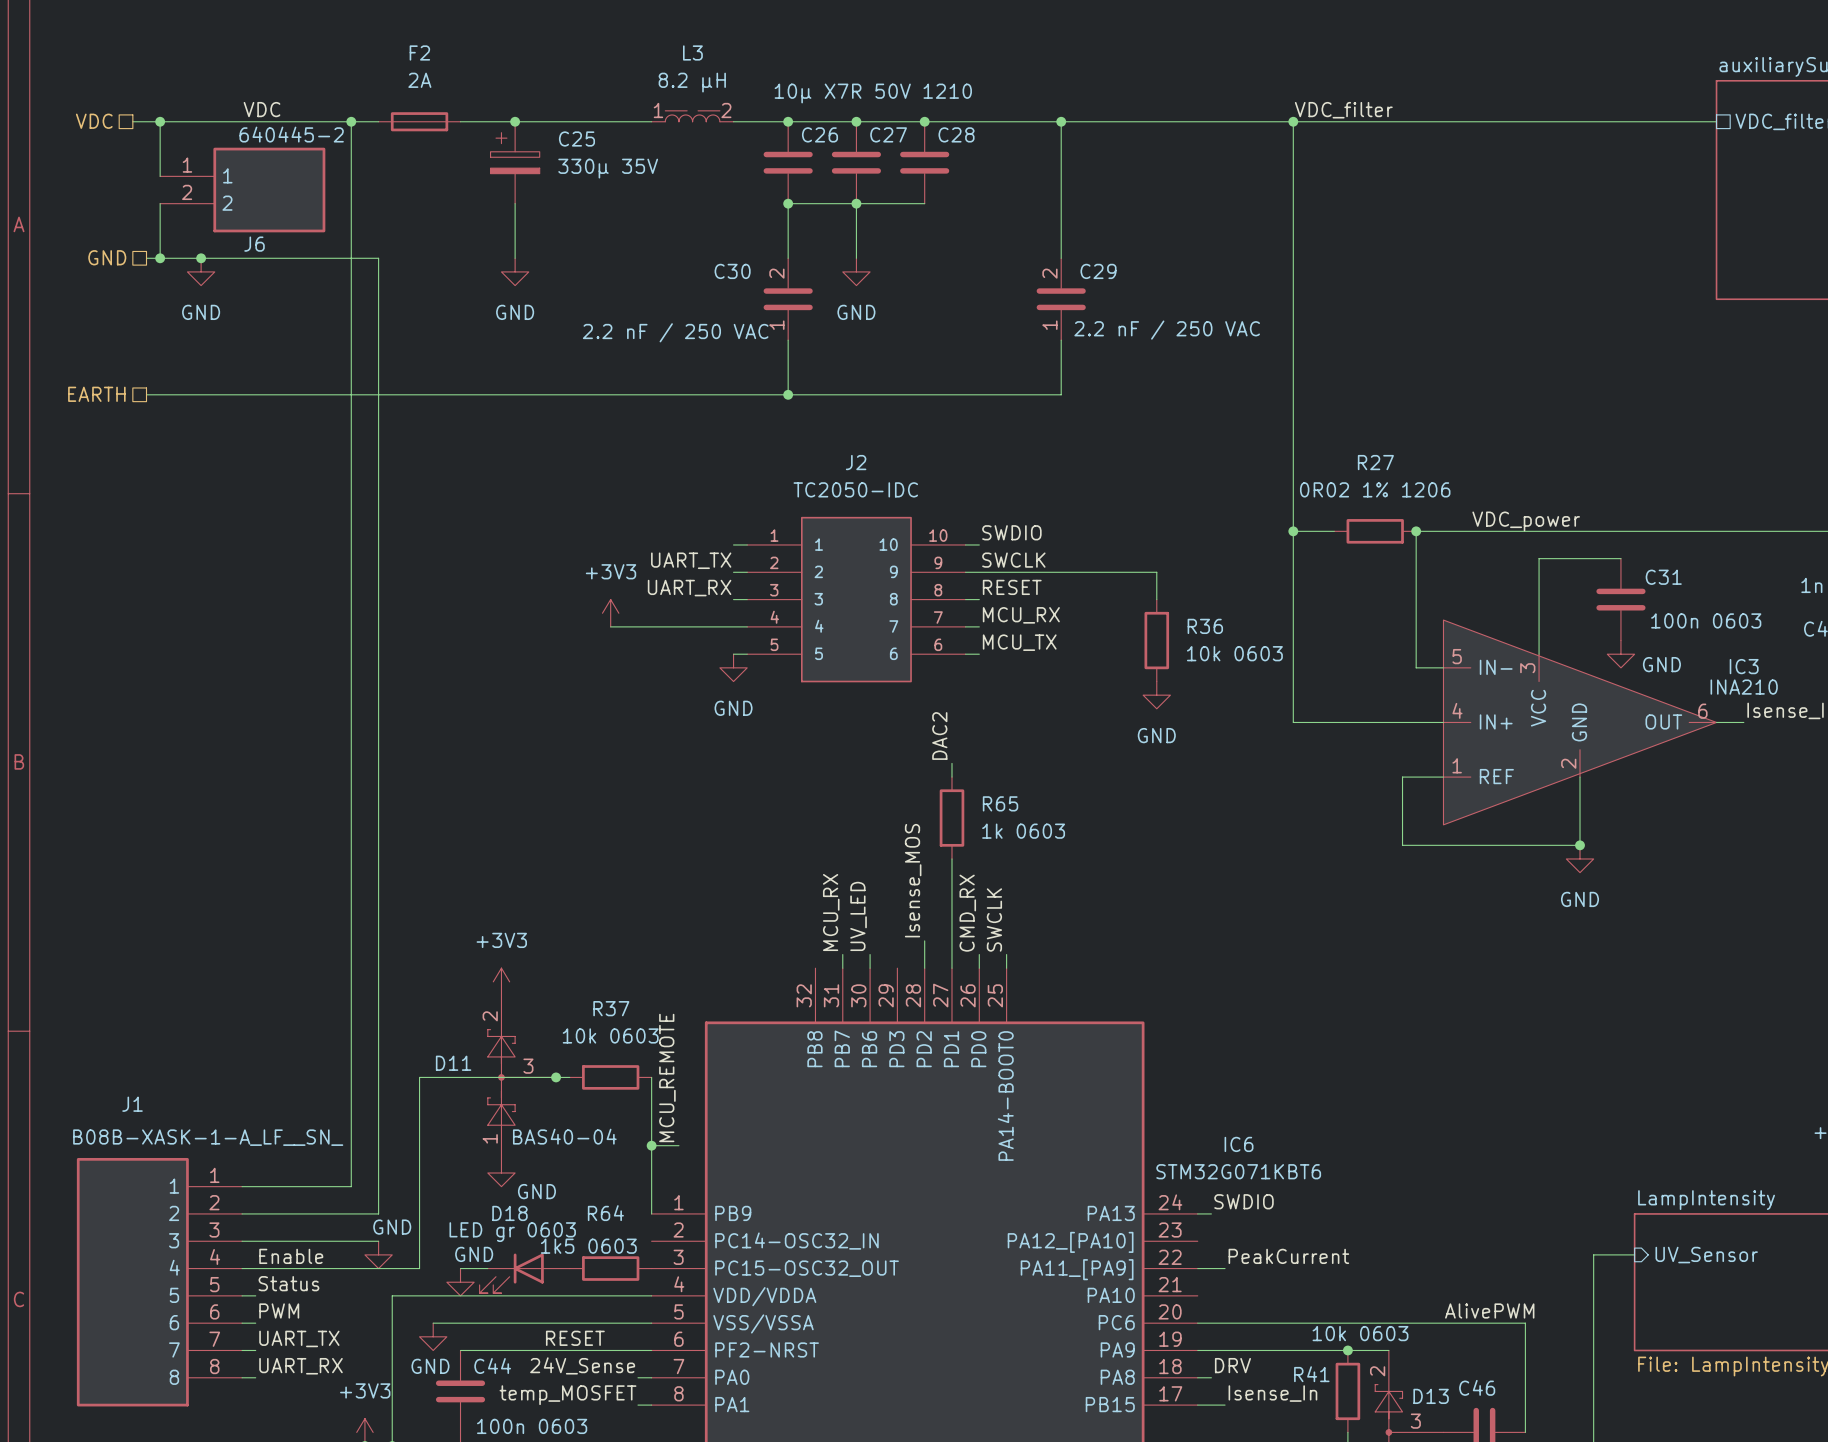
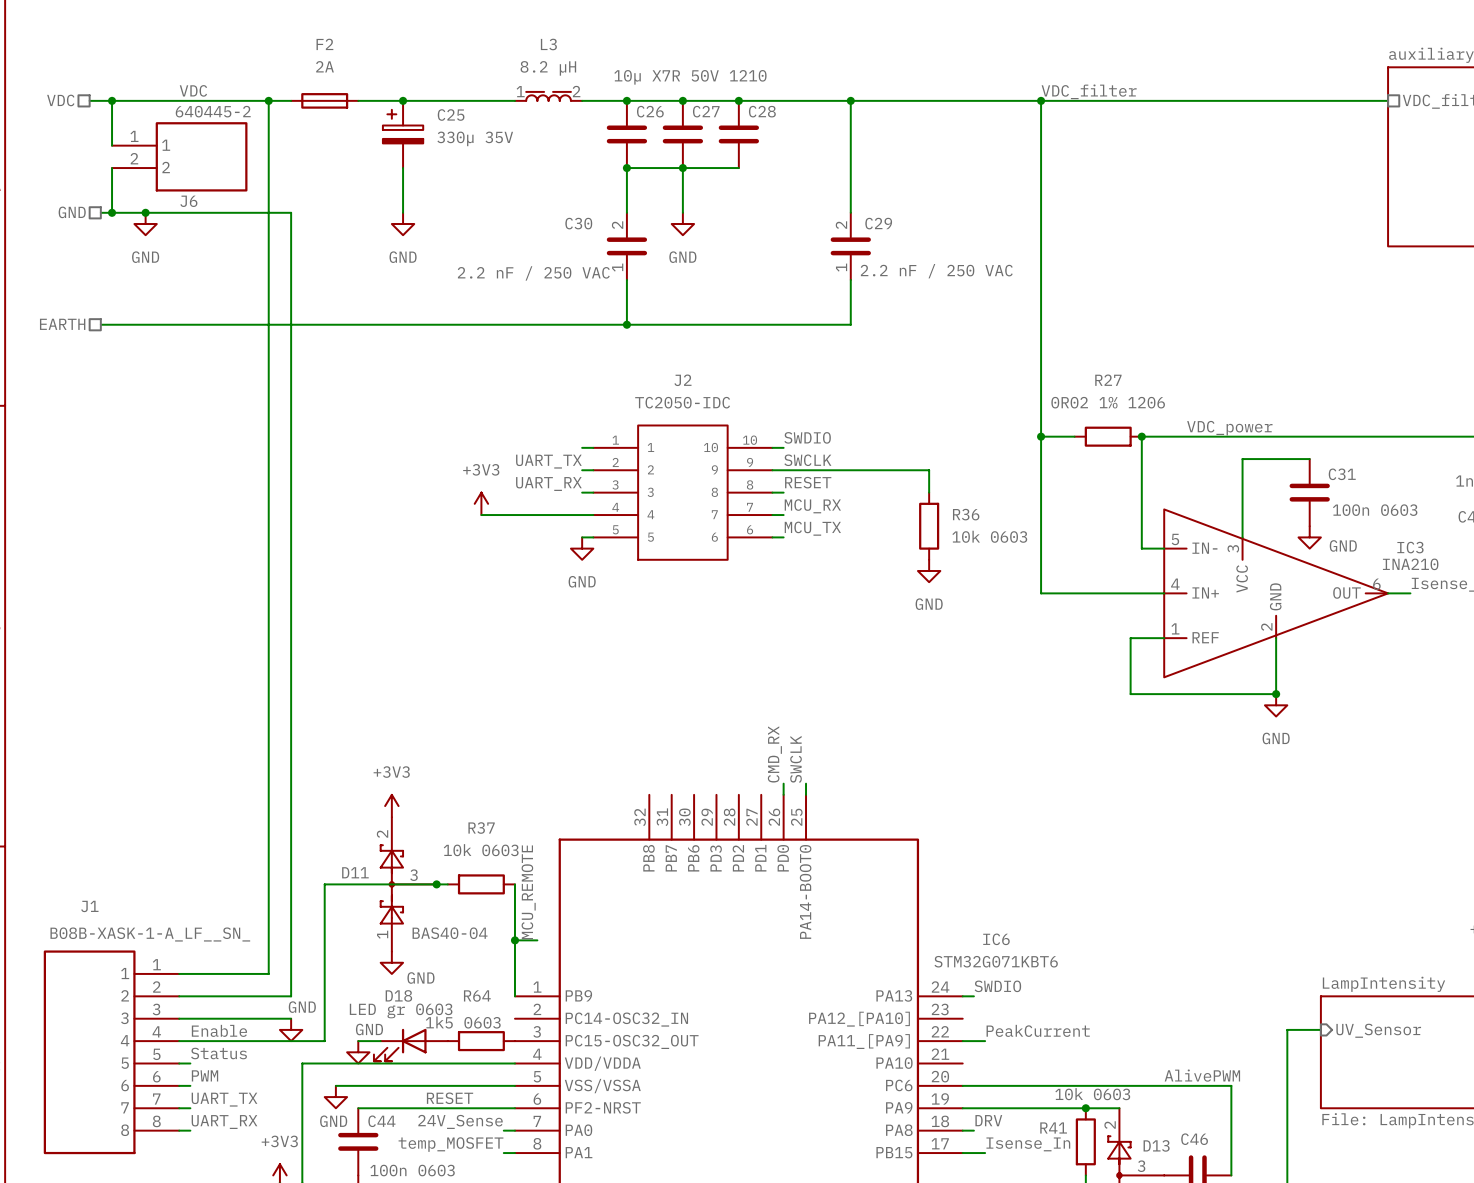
label: DAC2 (939, 736) -> none
wire: (951, 763) (951, 777) -> none
R65: 1k 0603 (951, 818) -> none
wire: (951, 858) (951, 968) -> none
label: Isense_MOS (913, 880) -> none
label: MCU_RX (831, 912) -> none
label: UV_LED (858, 916) -> none
wire: (924, 940) (924, 968) -> none
wire: (842, 954) (842, 968) -> none
wire: (870, 954) (870, 968) -> none

